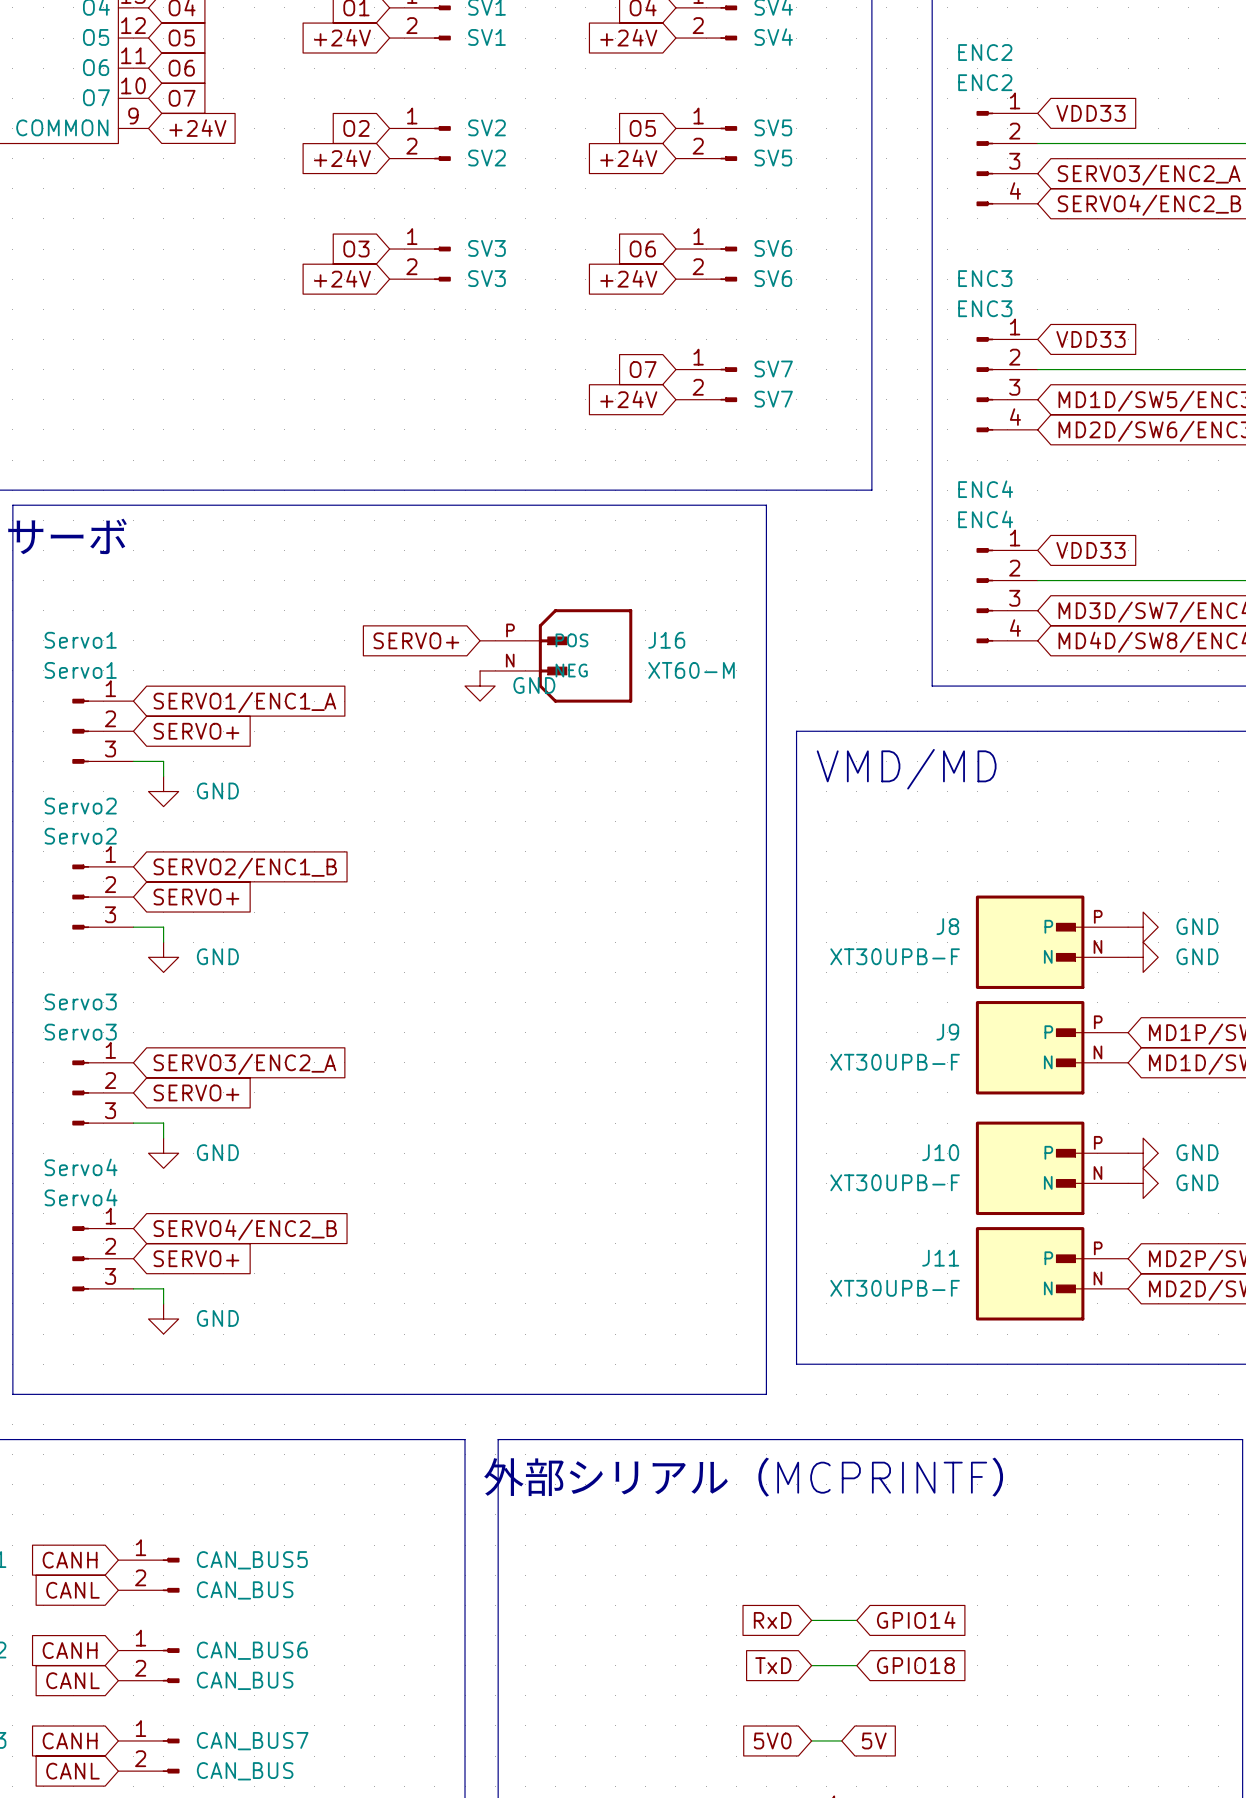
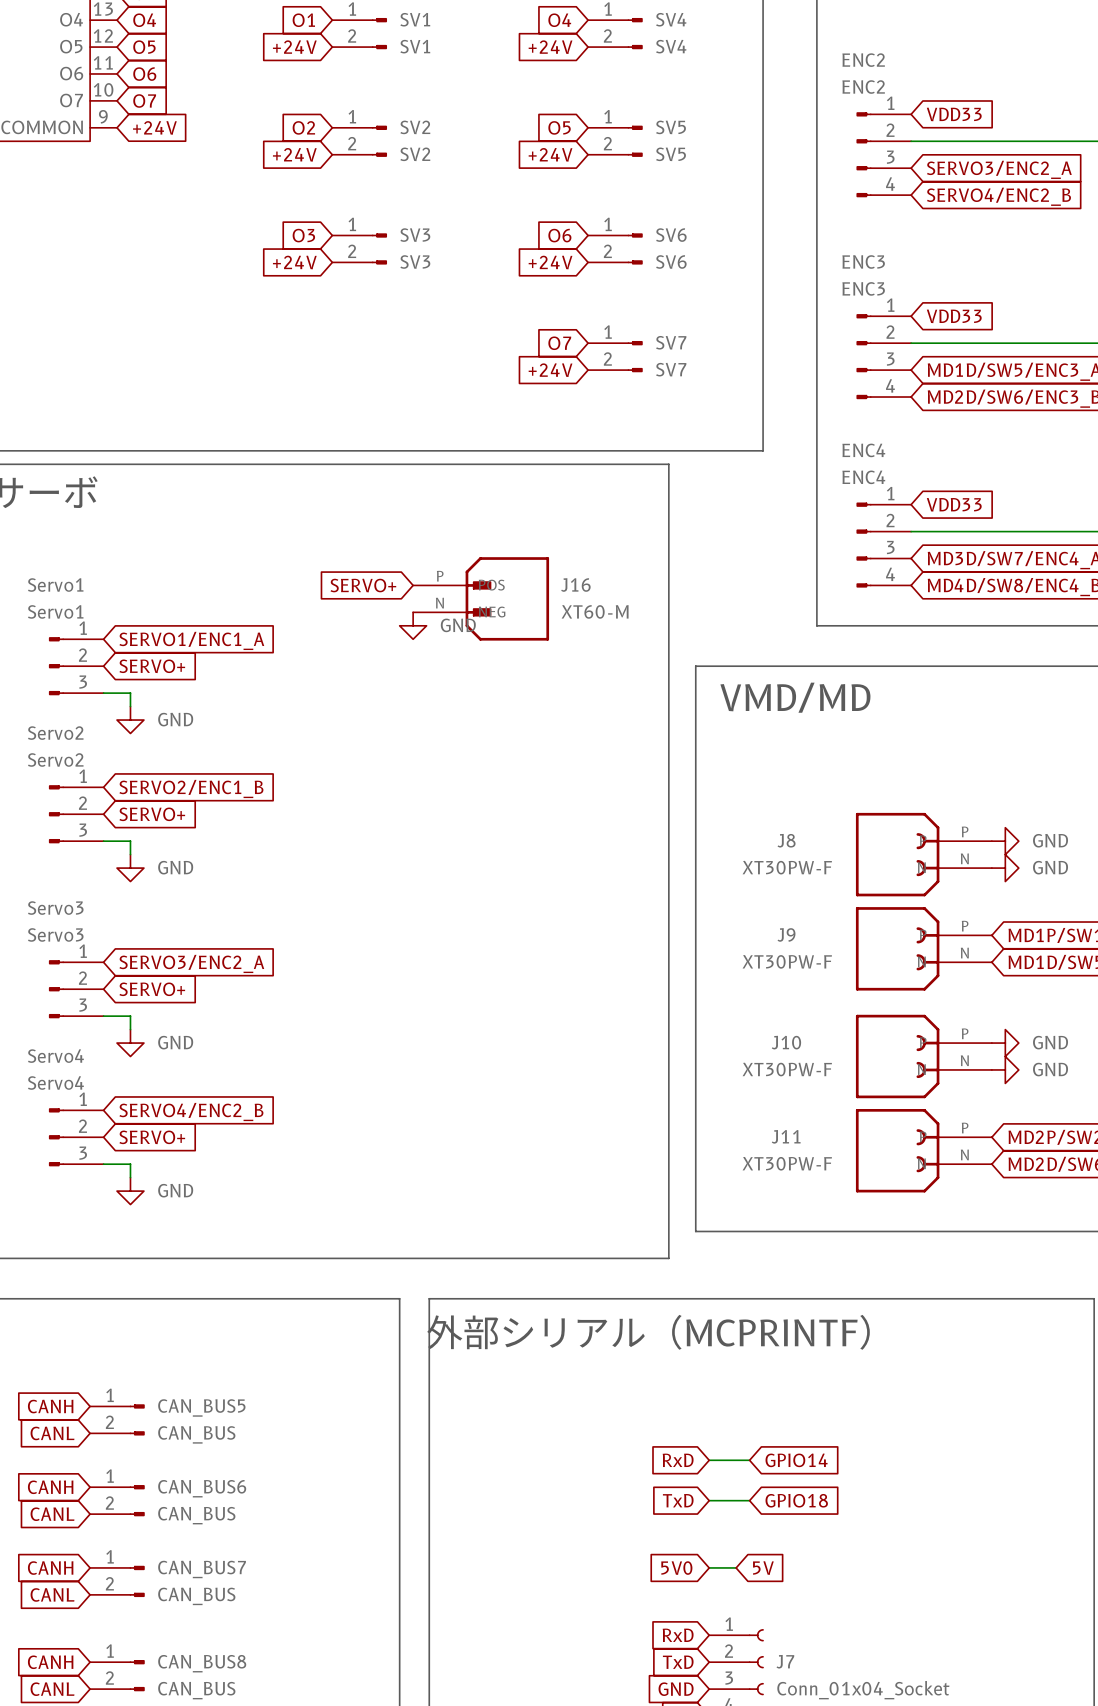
J8 symbol: [975, 895, 1129, 989] -> [855, 812, 992, 897]
J8 name position: J8 (947, 926) -> J8 (786, 840)
J8 value: XT30UPB-F (895, 956) -> XT30PW-F (787, 867)
J9 symbol: [975, 1001, 1129, 1095] -> [855, 907, 992, 991]
J9 name position: J9 (947, 1032) -> J9 (786, 934)
J9 value: XT30UPB-F (895, 1062) -> XT30PW-F (787, 961)
J10 symbol: [975, 1121, 1129, 1216] -> [855, 1014, 992, 1099]
J10 name position: J10 (940, 1152) -> J10 (786, 1042)
J10 value: XT30UPB-F (895, 1182) -> XT30PW-F (787, 1069)
J11 symbol: [975, 1227, 1129, 1321] -> [855, 1109, 992, 1193]
J11 name position: J11 (940, 1258) -> J11 (786, 1136)
J11 value: XT30UPB-F (895, 1288) -> XT30PW-F (787, 1163)

